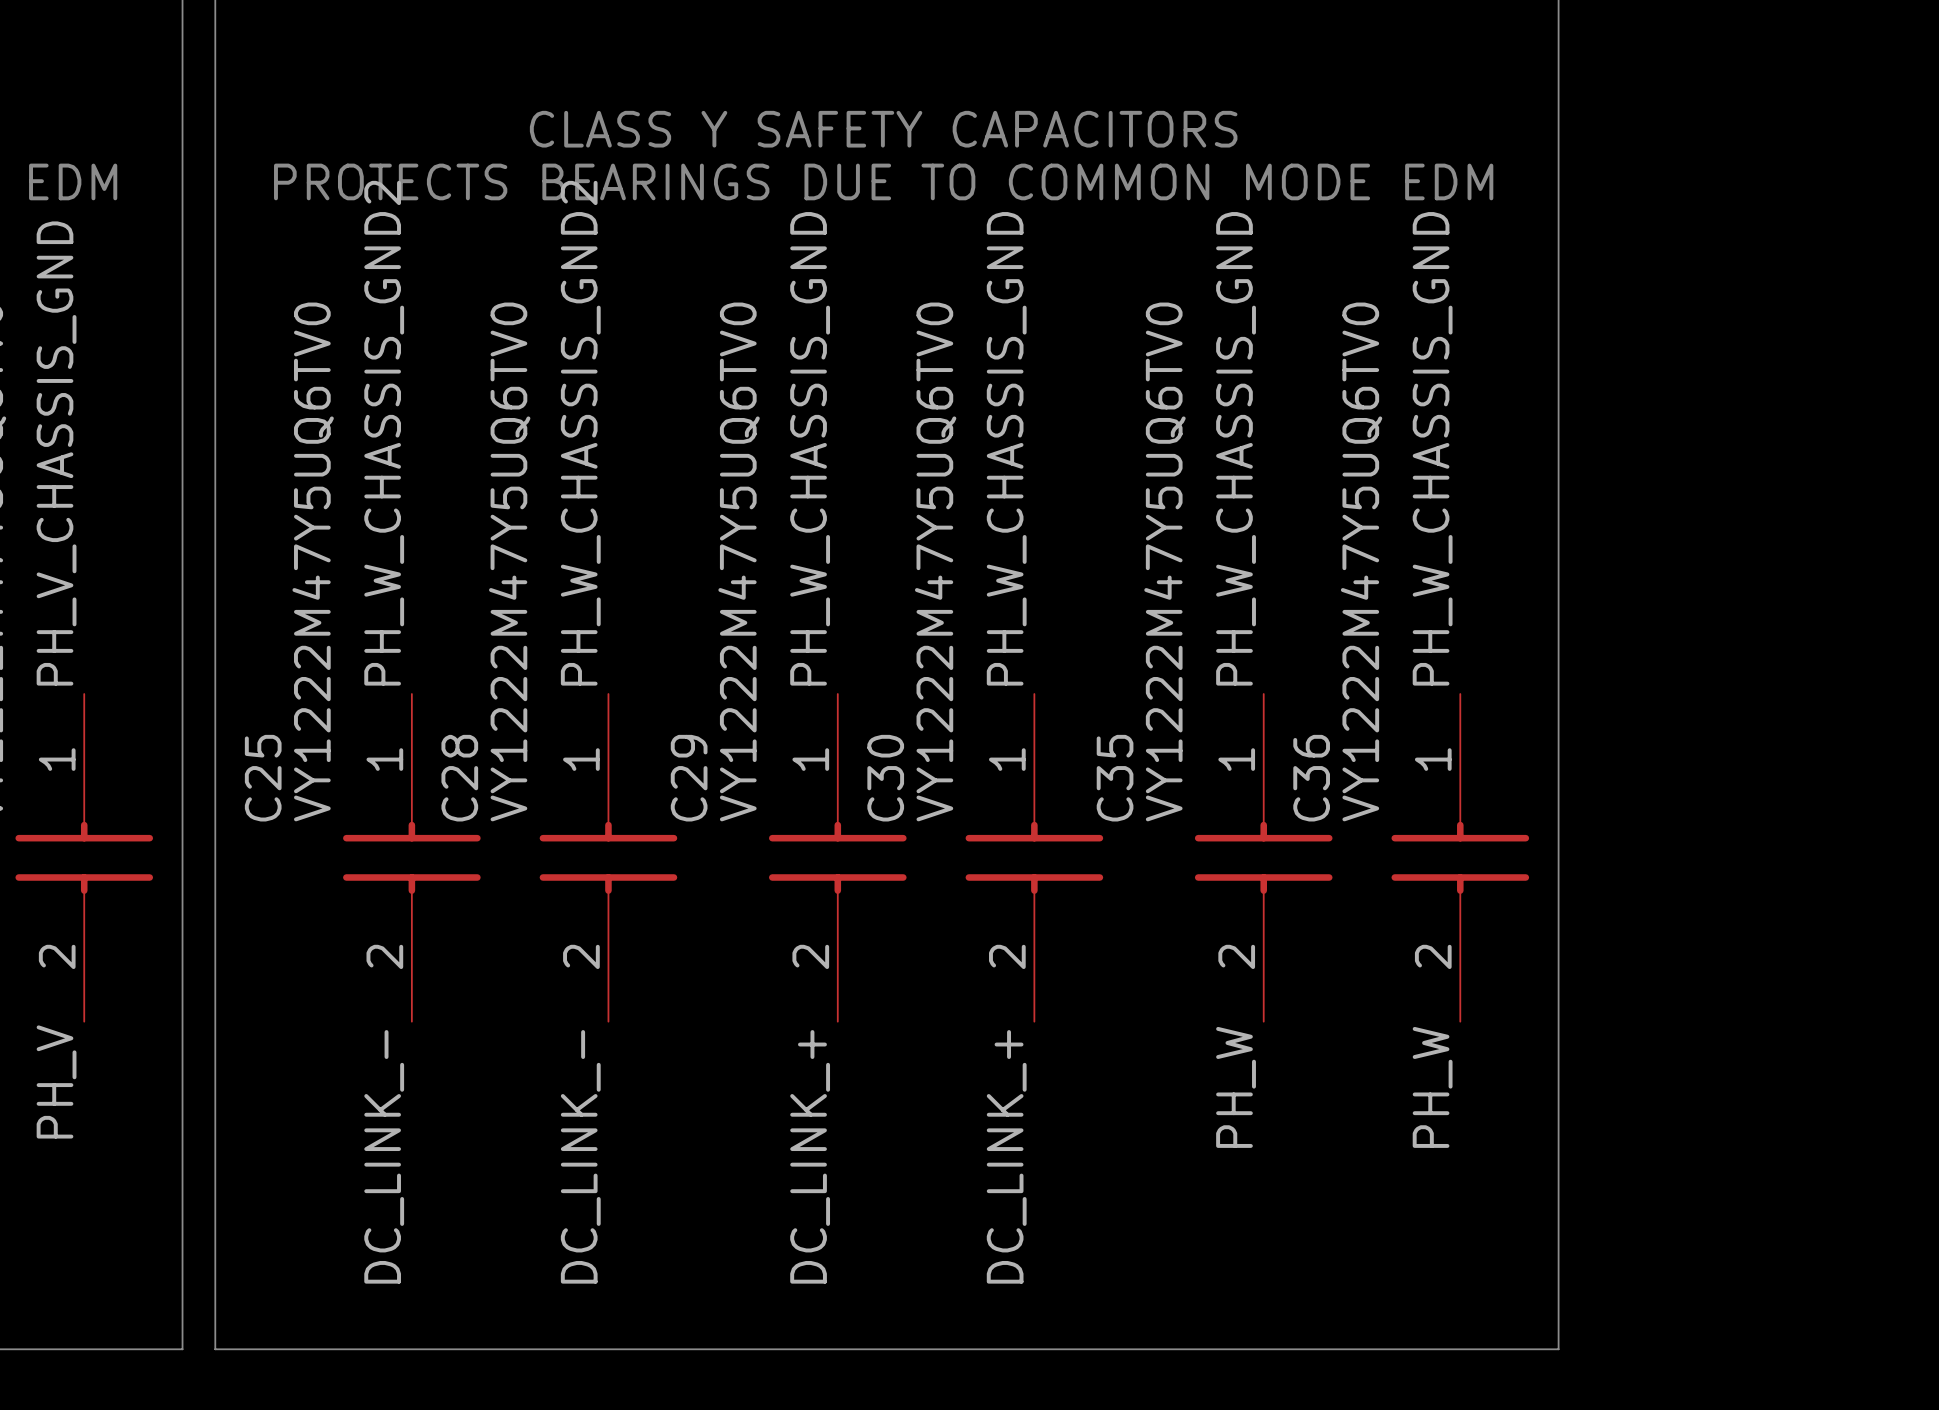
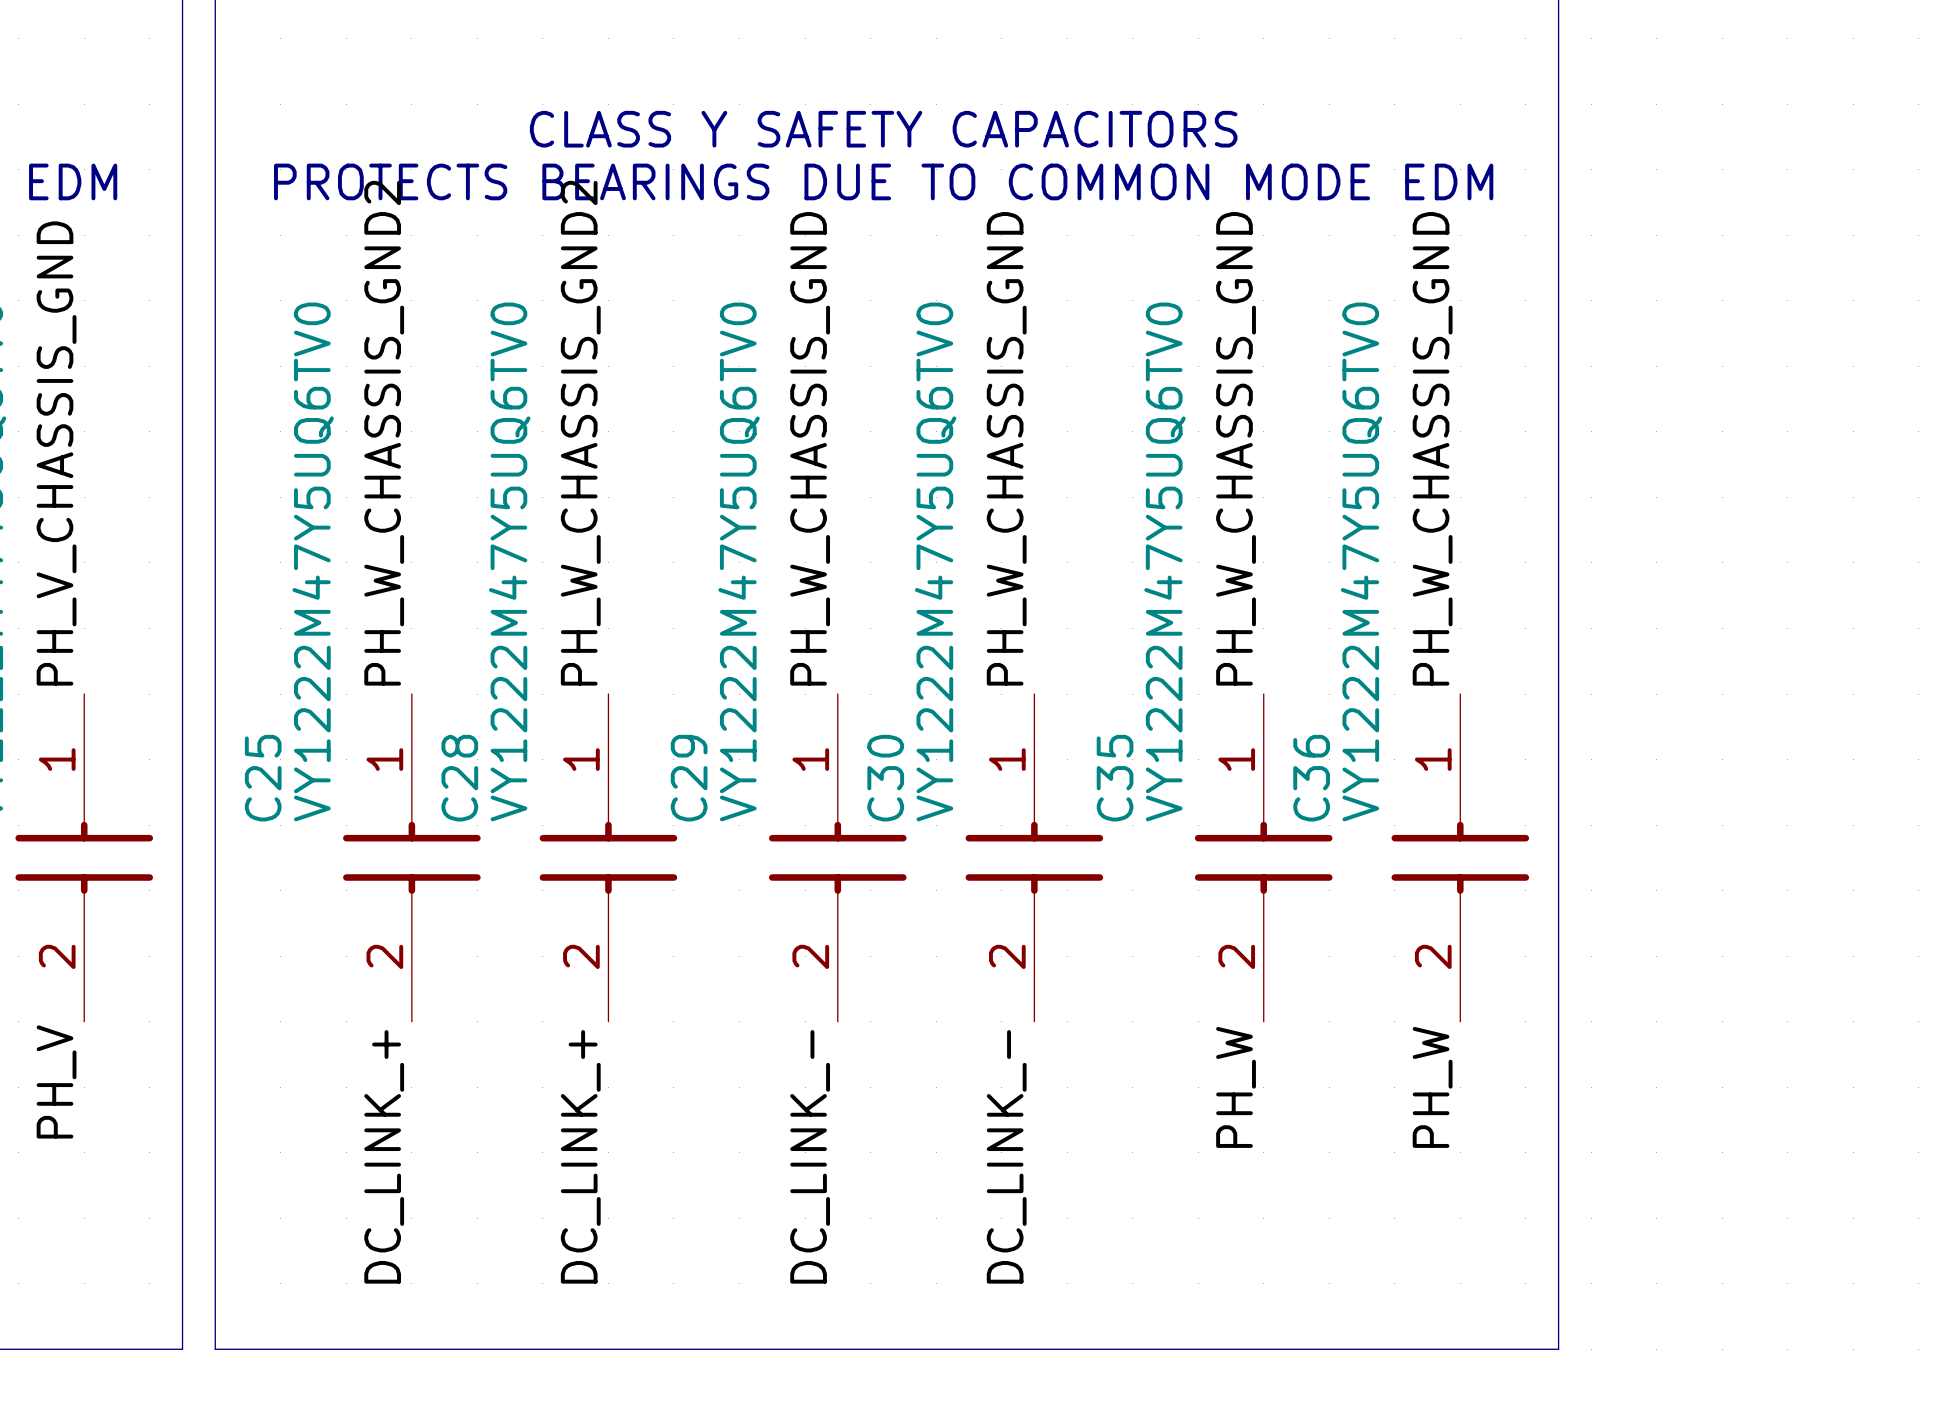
label: DC_LINK_- (384, 1156) -> DC_LINK_+ (384, 1156)
label: DC_LINK_- (580, 1156) -> DC_LINK_+ (580, 1156)
label: DC_LINK_+ (810, 1156) -> DC_LINK_- (810, 1156)
label: DC_LINK_+ (1006, 1156) -> DC_LINK_- (1006, 1156)

